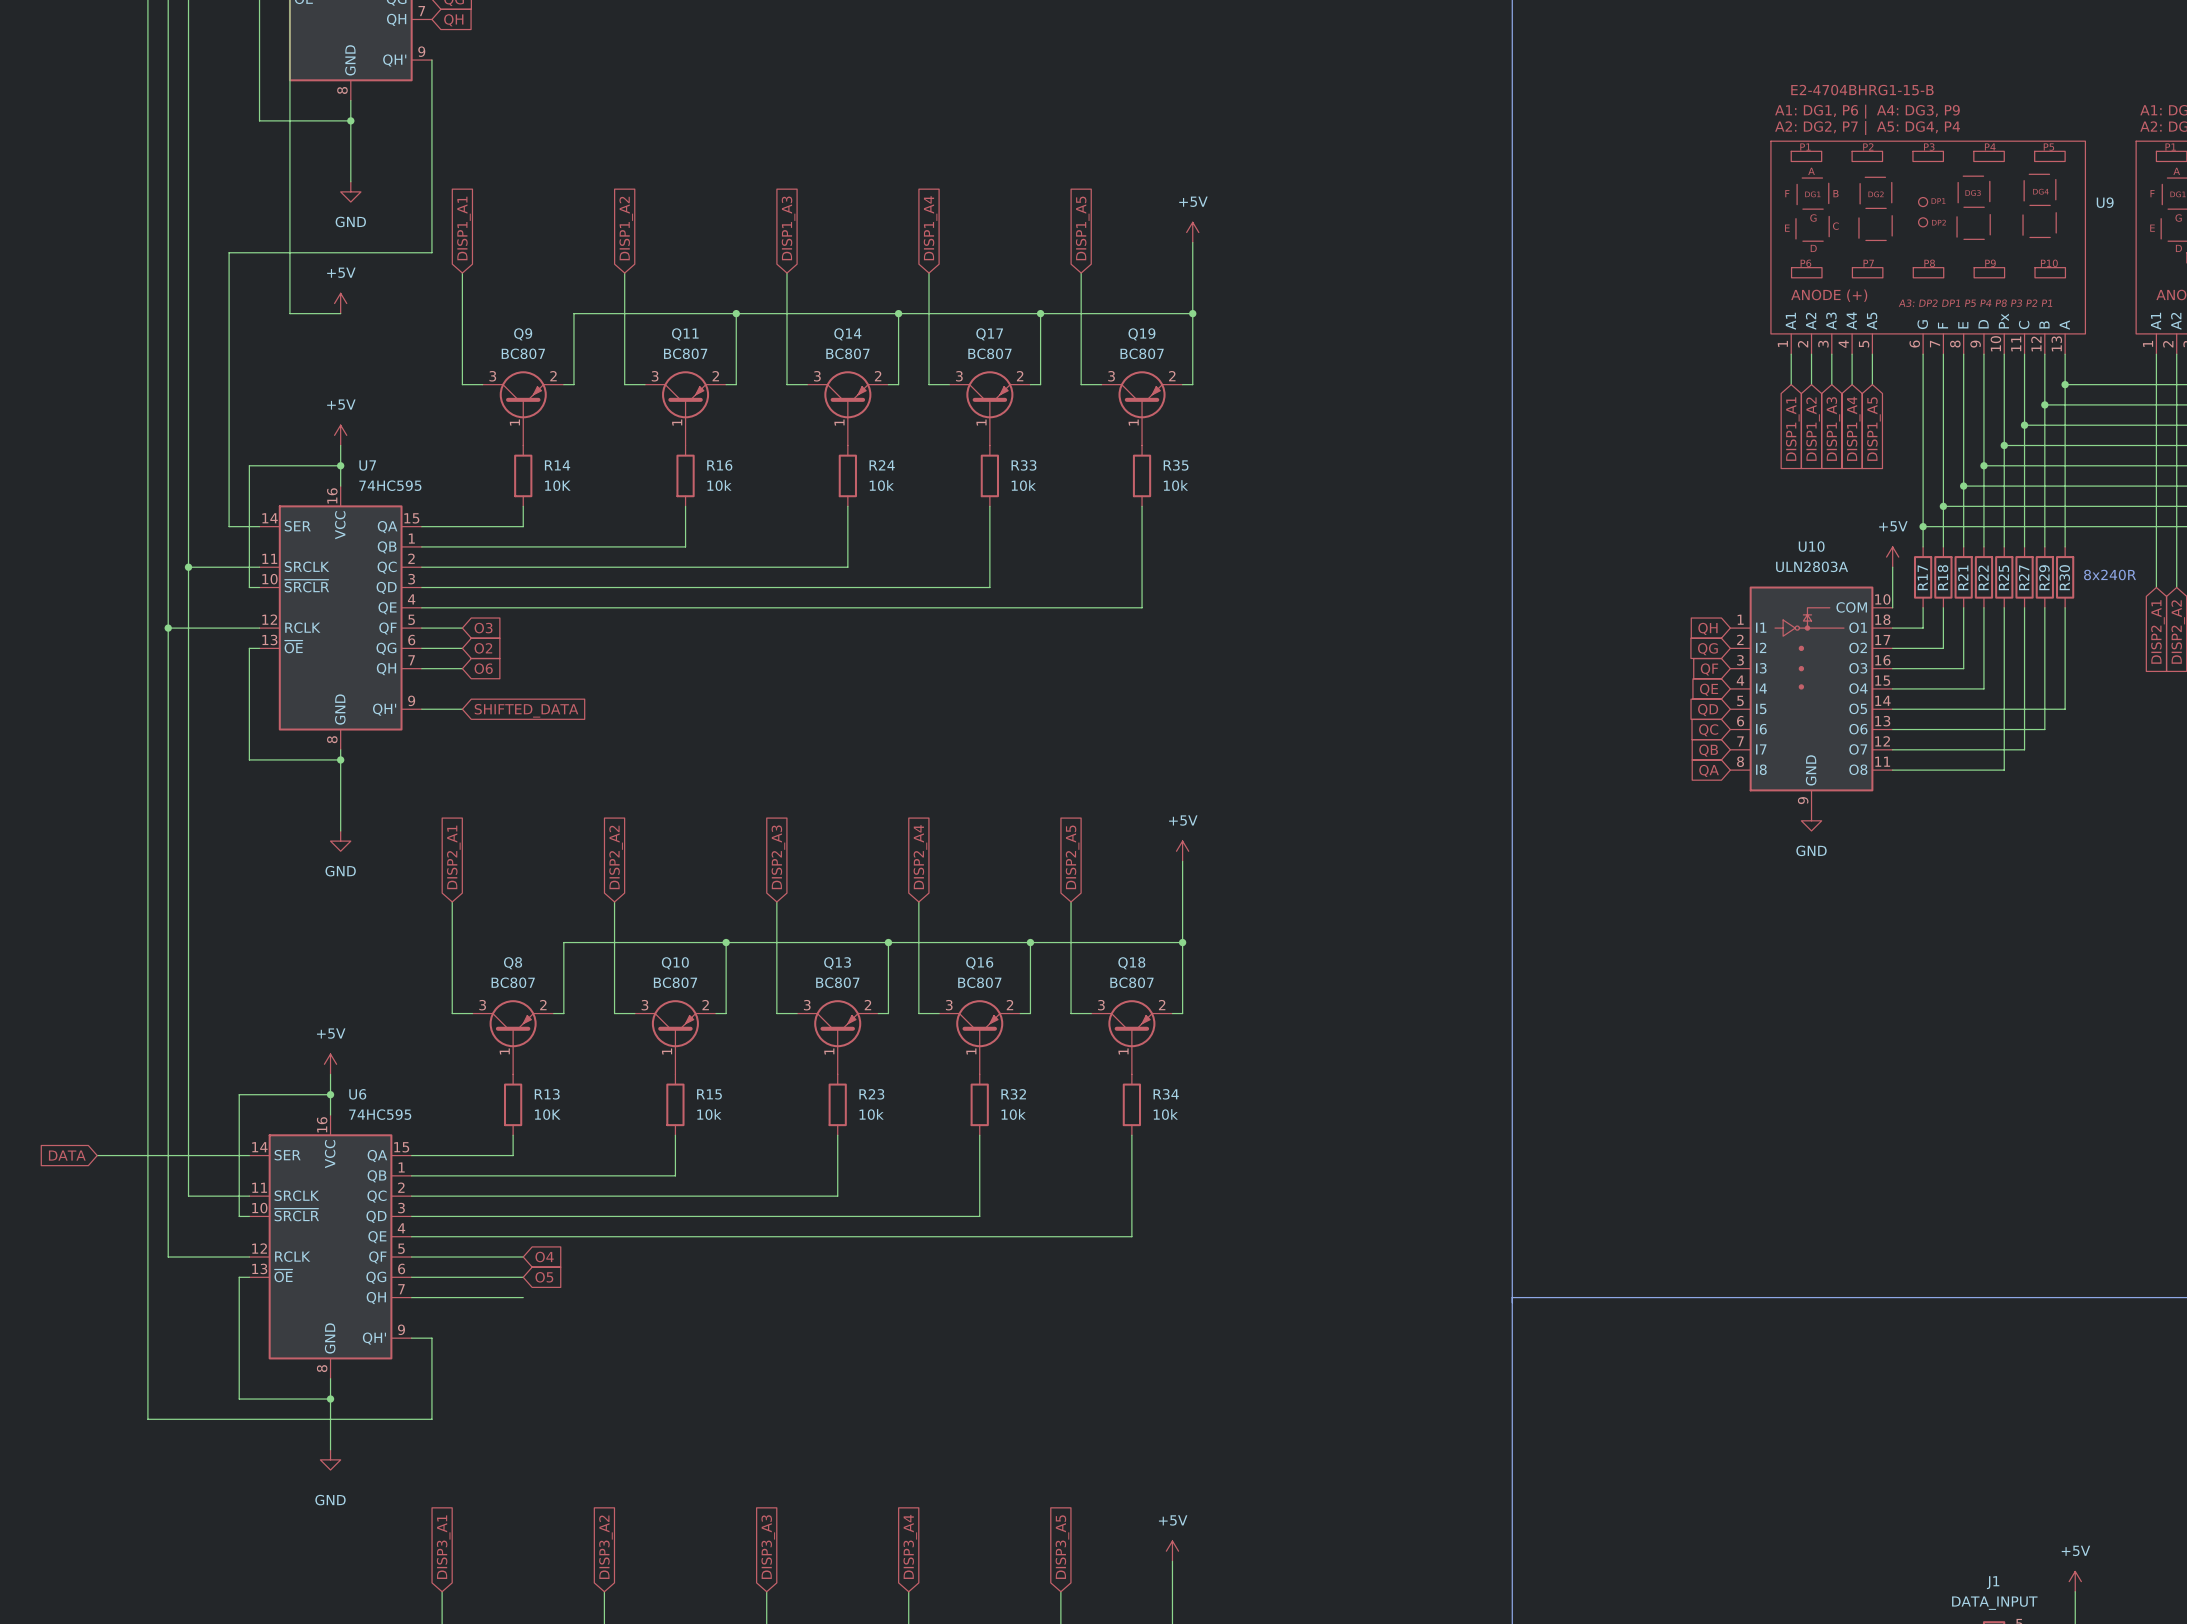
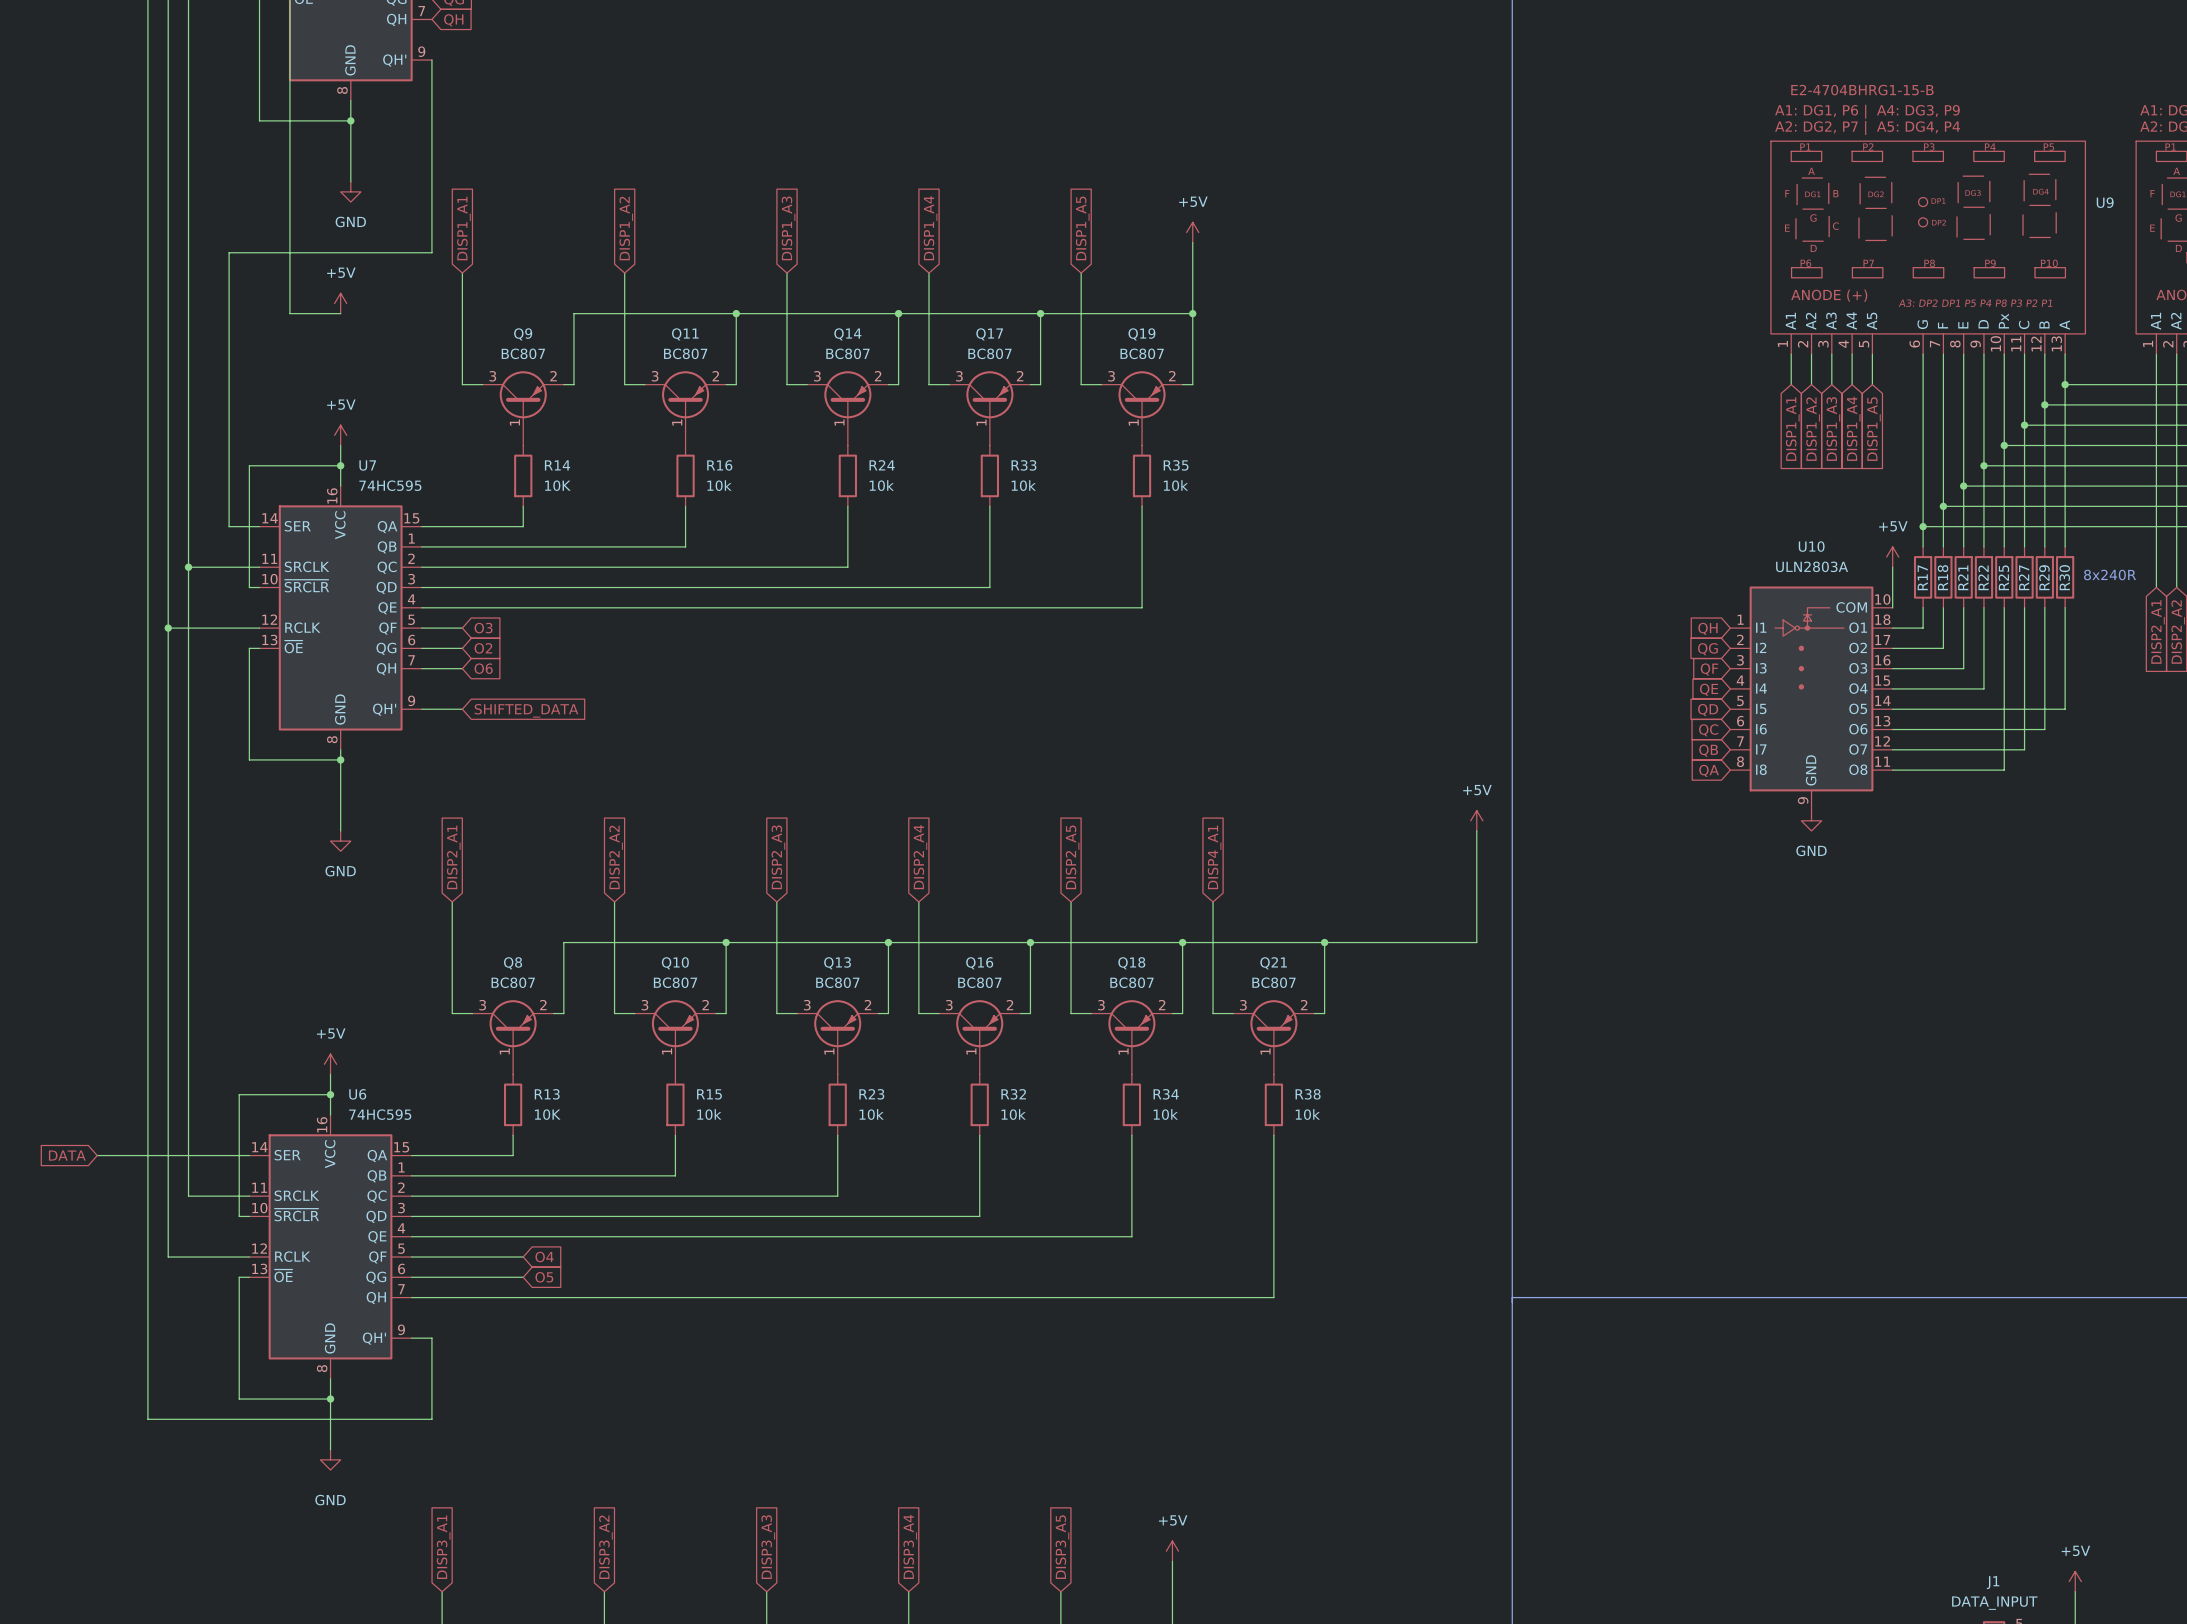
power symbol: none -> +5V (1476, 820)
power symbol: +5V (1182, 851) -> none
global label: none -> DISP4_A1 (1214, 857)
wire: (1182, 861) (1182, 942) -> (1476, 830) (1476, 942) (1182, 942)
wire: none -> (1213, 901) (1213, 1013) (1233, 1013)
wire: none -> (1324, 942) (1324, 1013) (1314, 1013)
junction: none -> (1324, 942)
Q21: none -> BC807 (1273, 1037)
R38: none -> 10k (1273, 1104)
wire: none -> (1273, 1135) (1273, 1297) (523, 1297)

